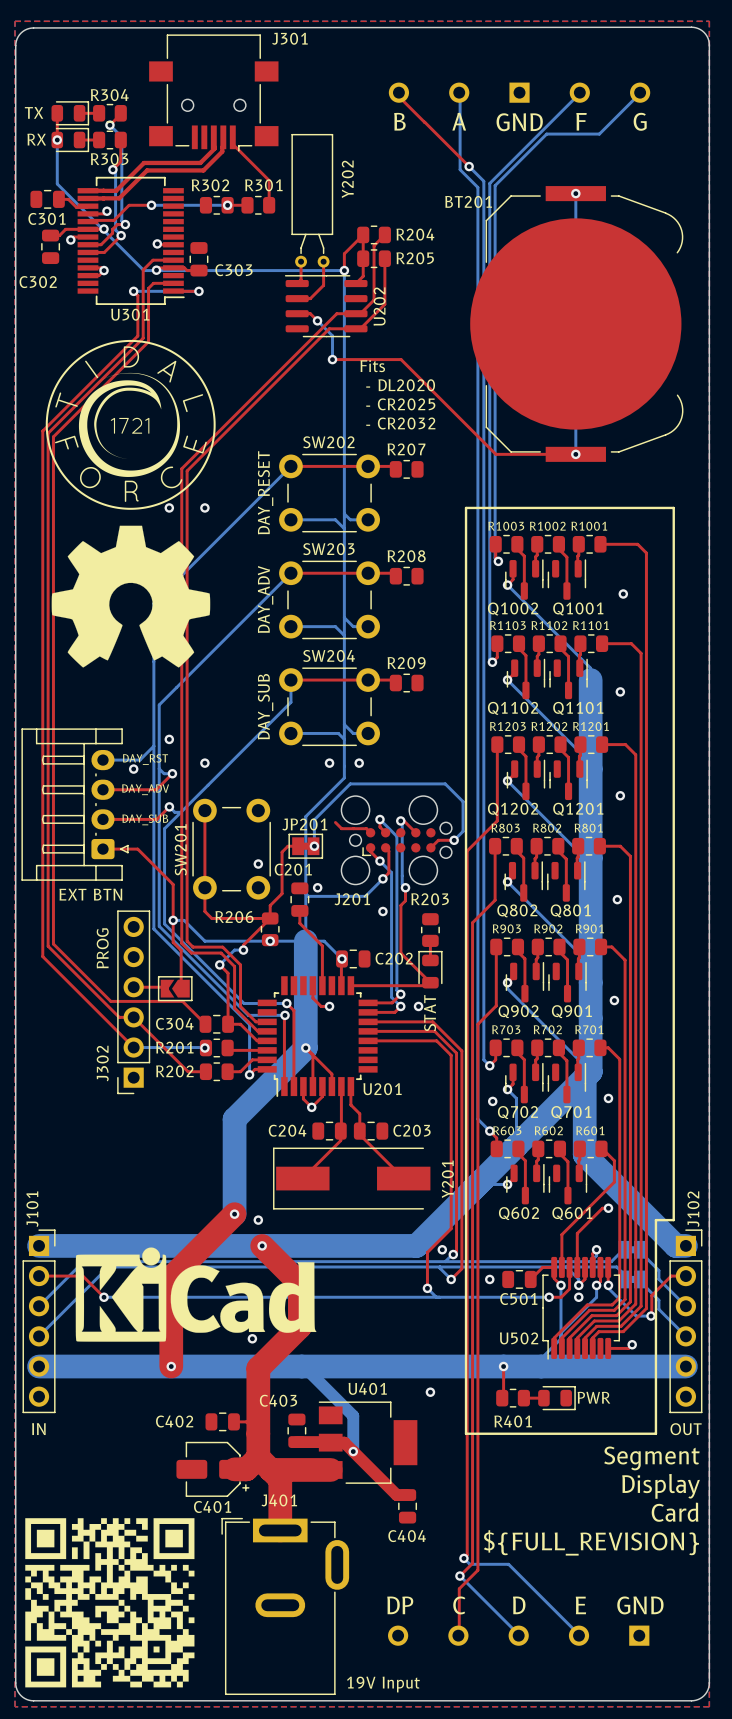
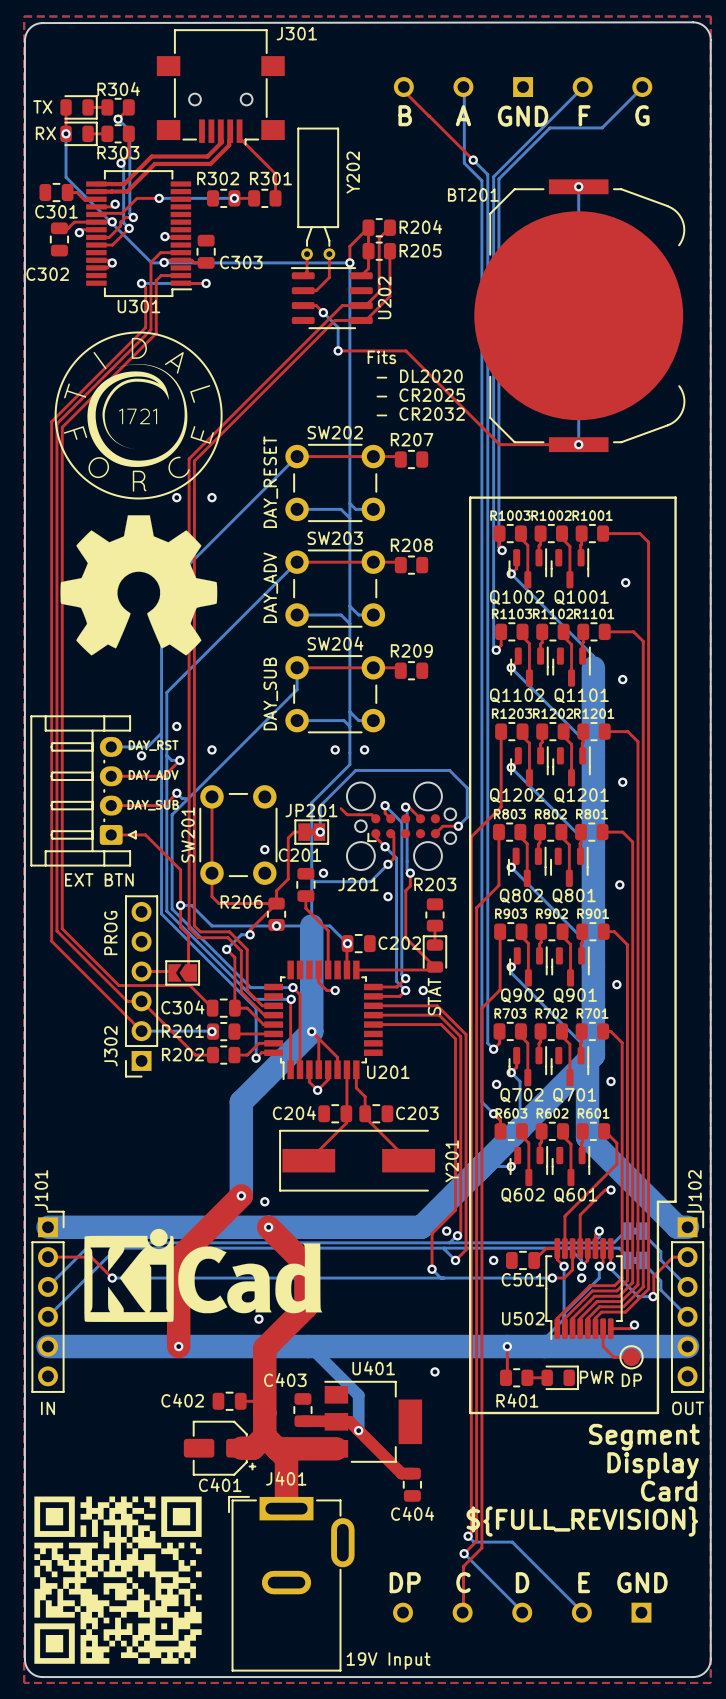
top track: none -> (603, 1328) (603, 1346) (613, 1357) (631, 1357)
part: none -> DP (631, 1357)

